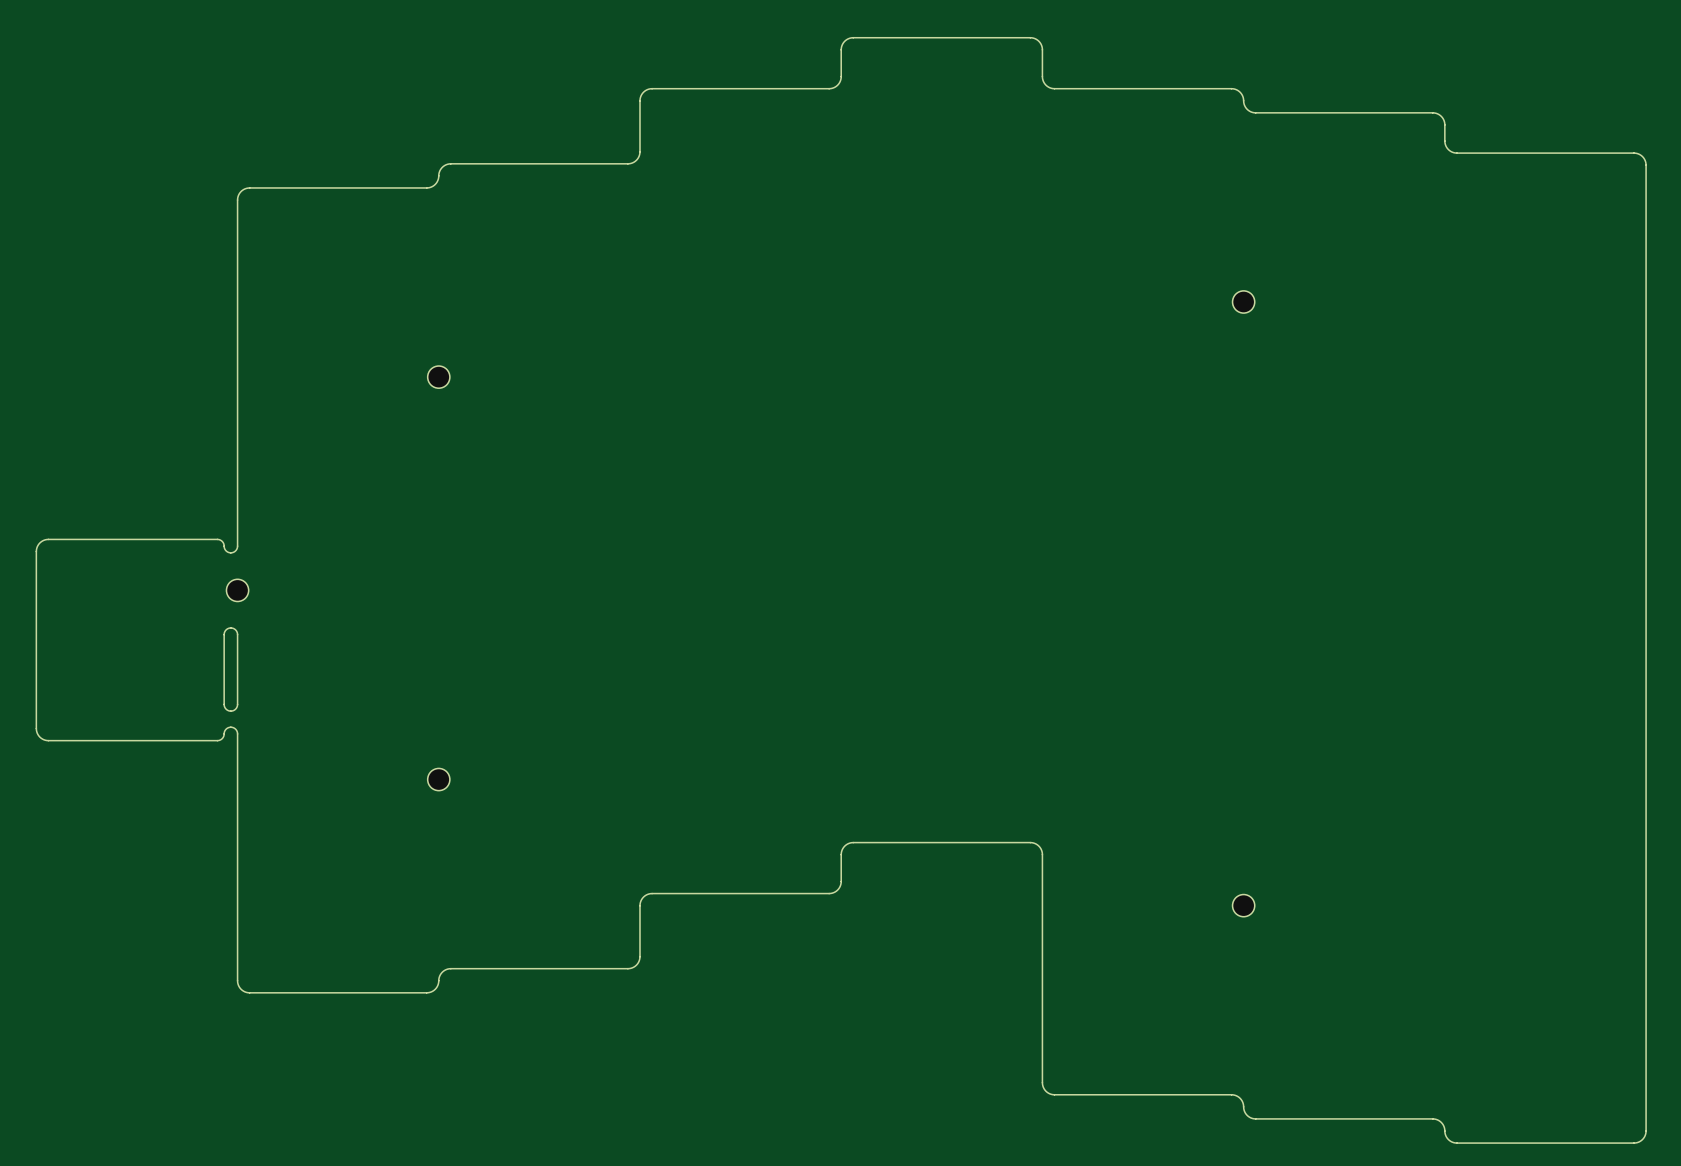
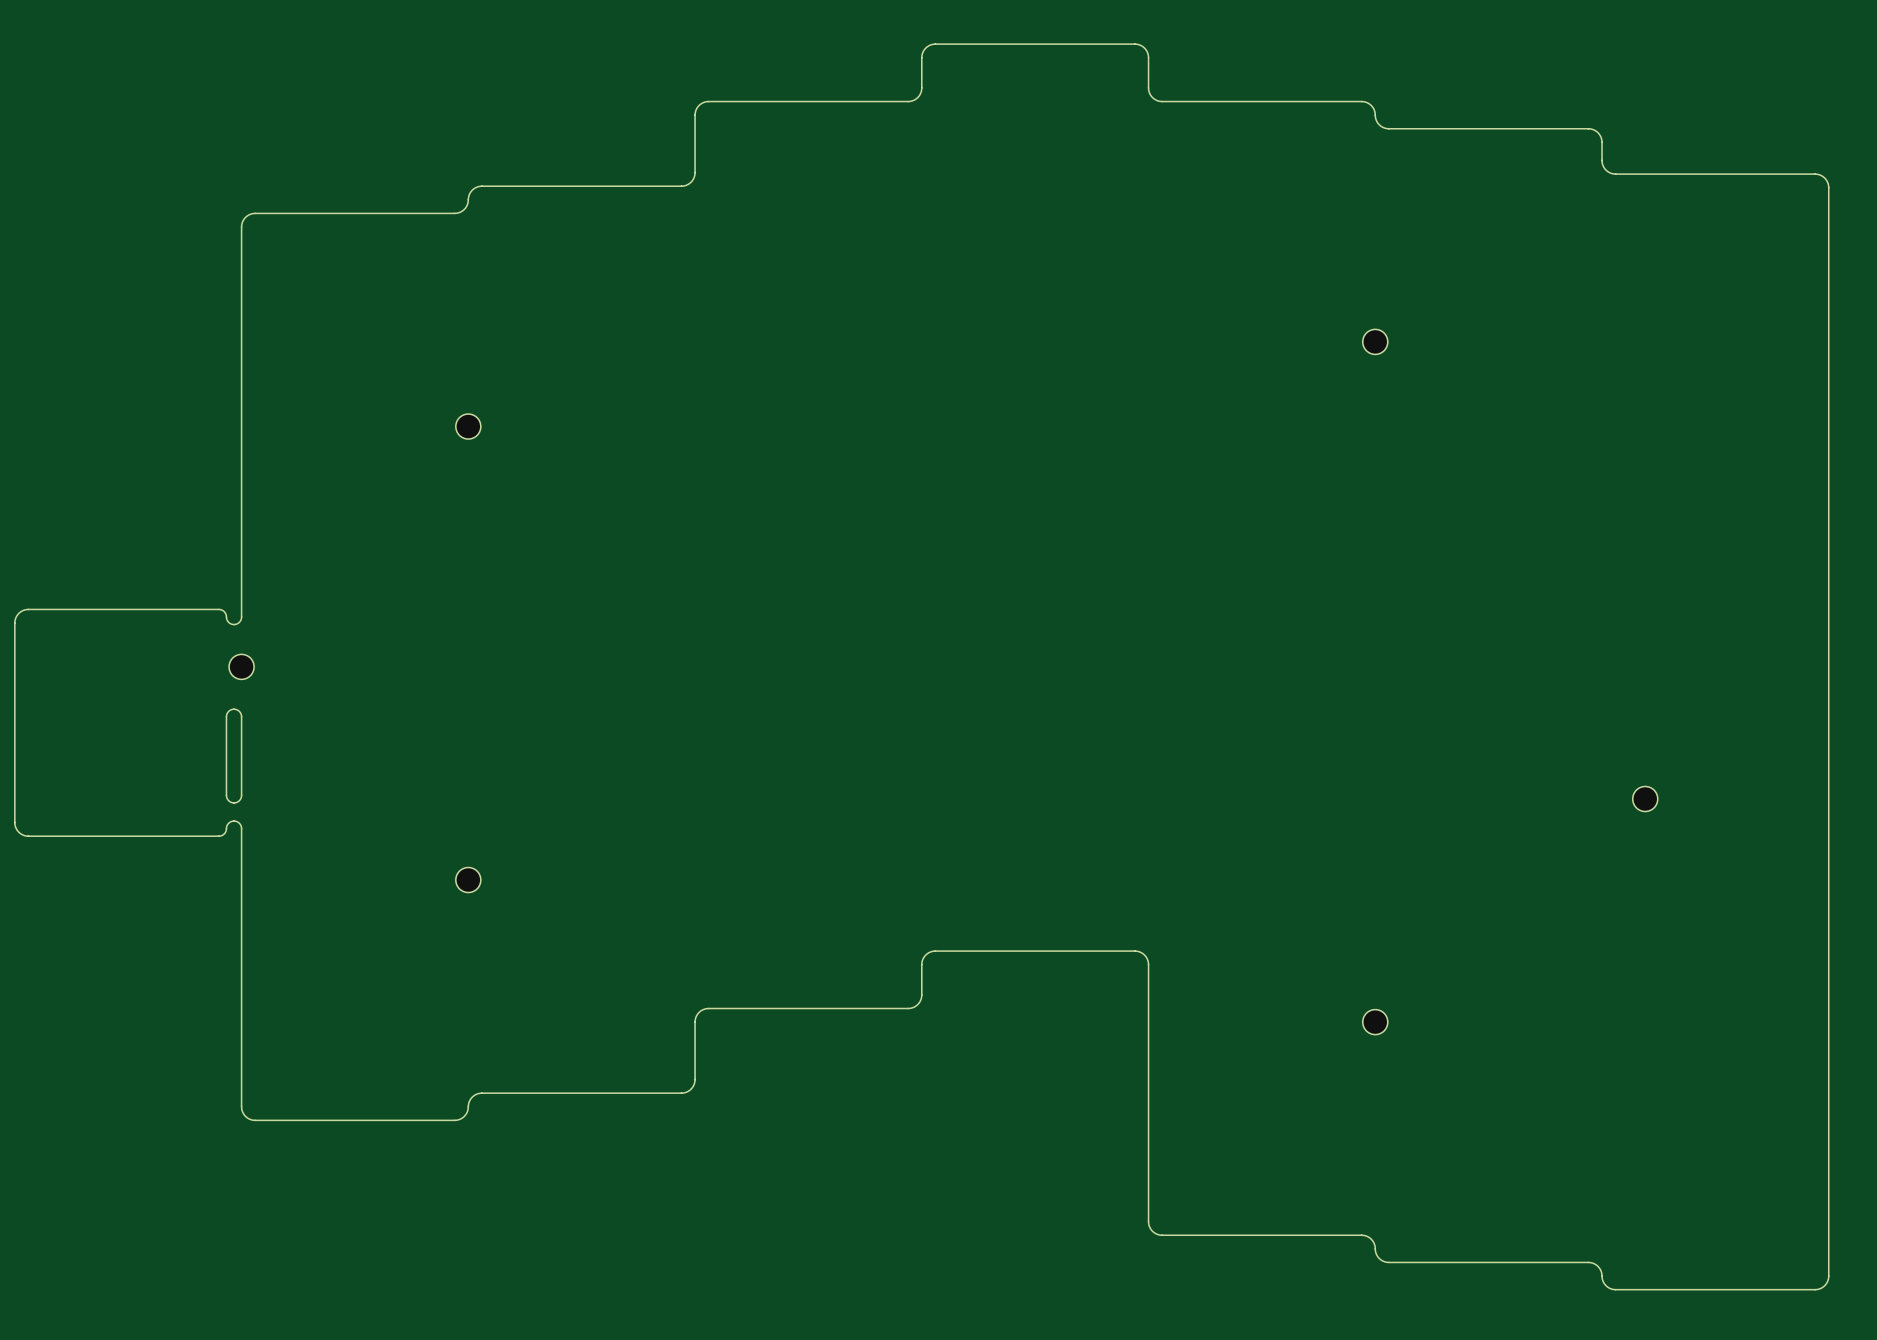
part: none -> (1645, 799)

